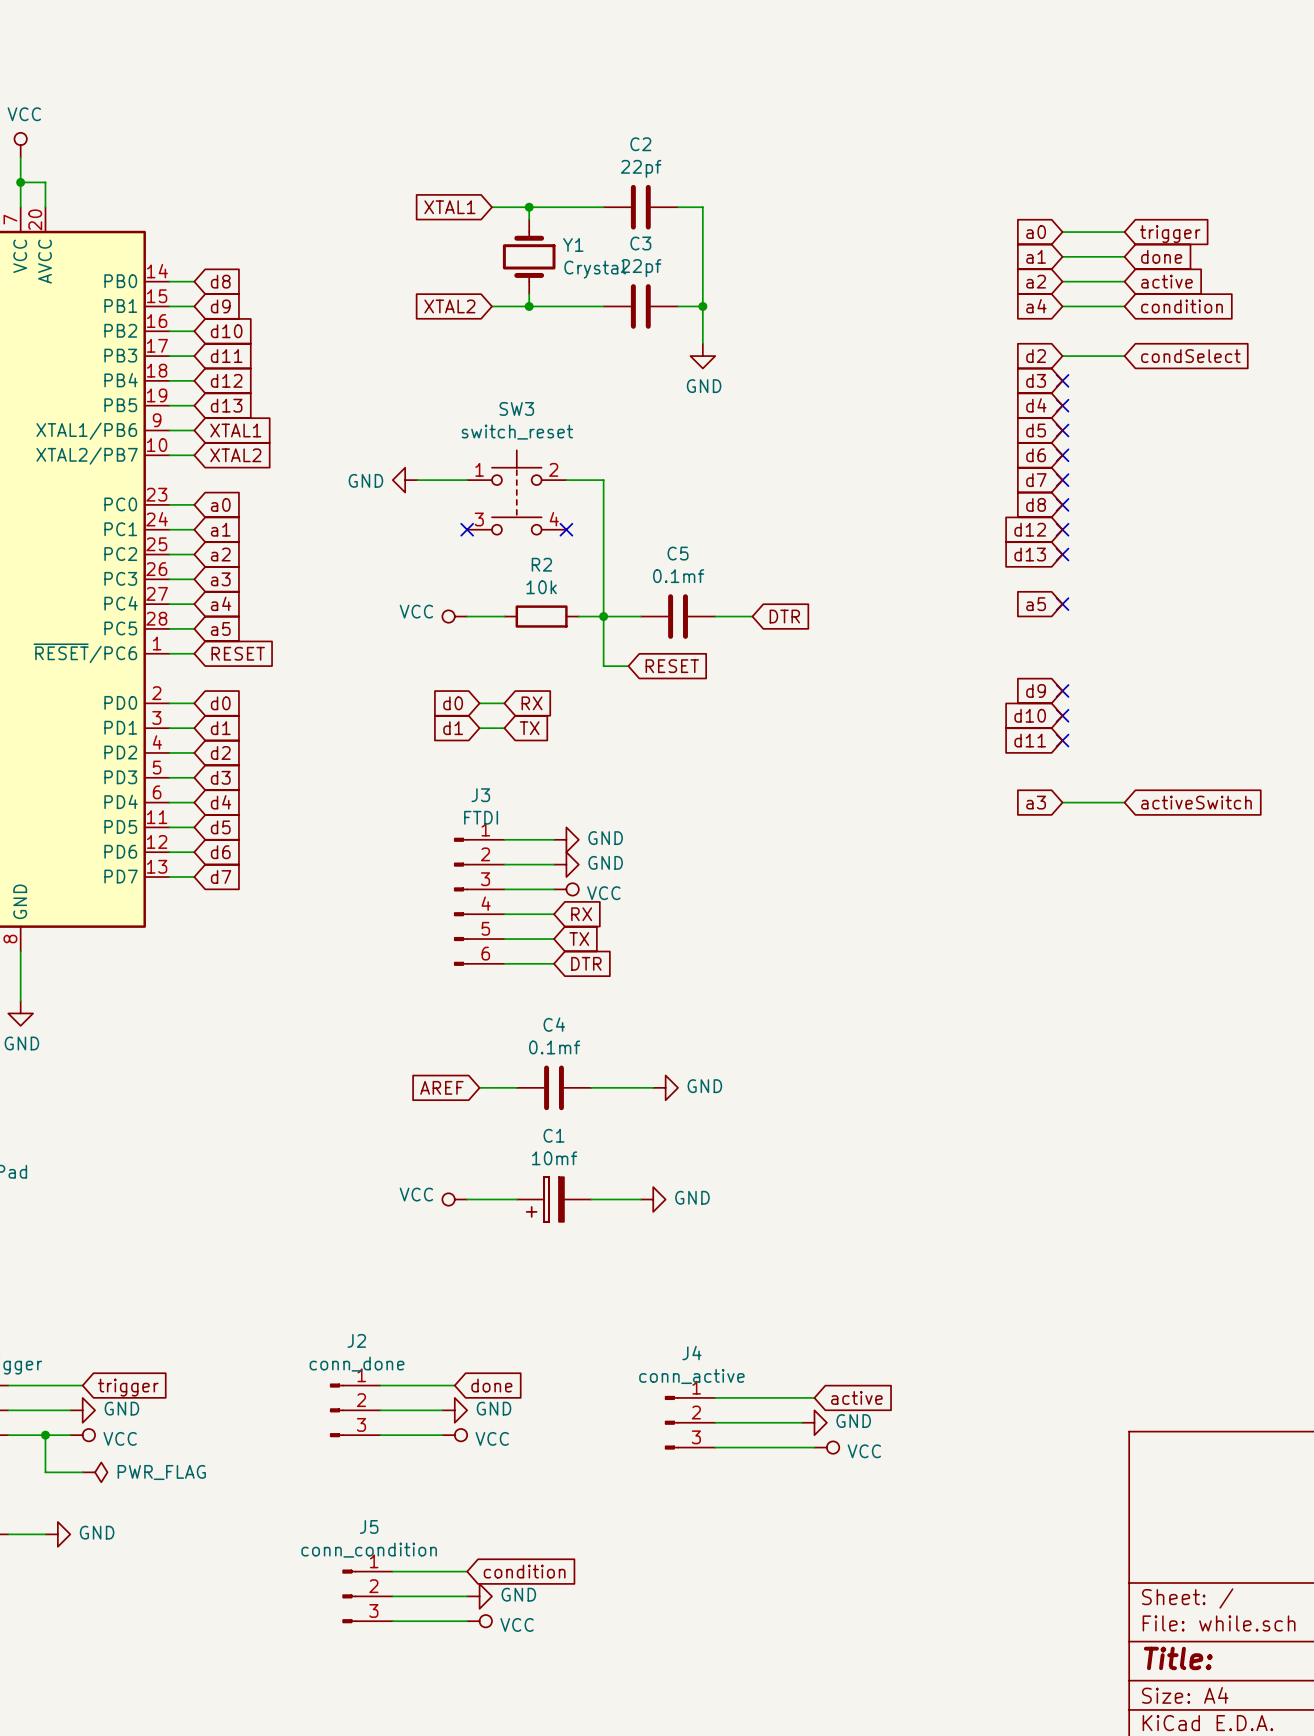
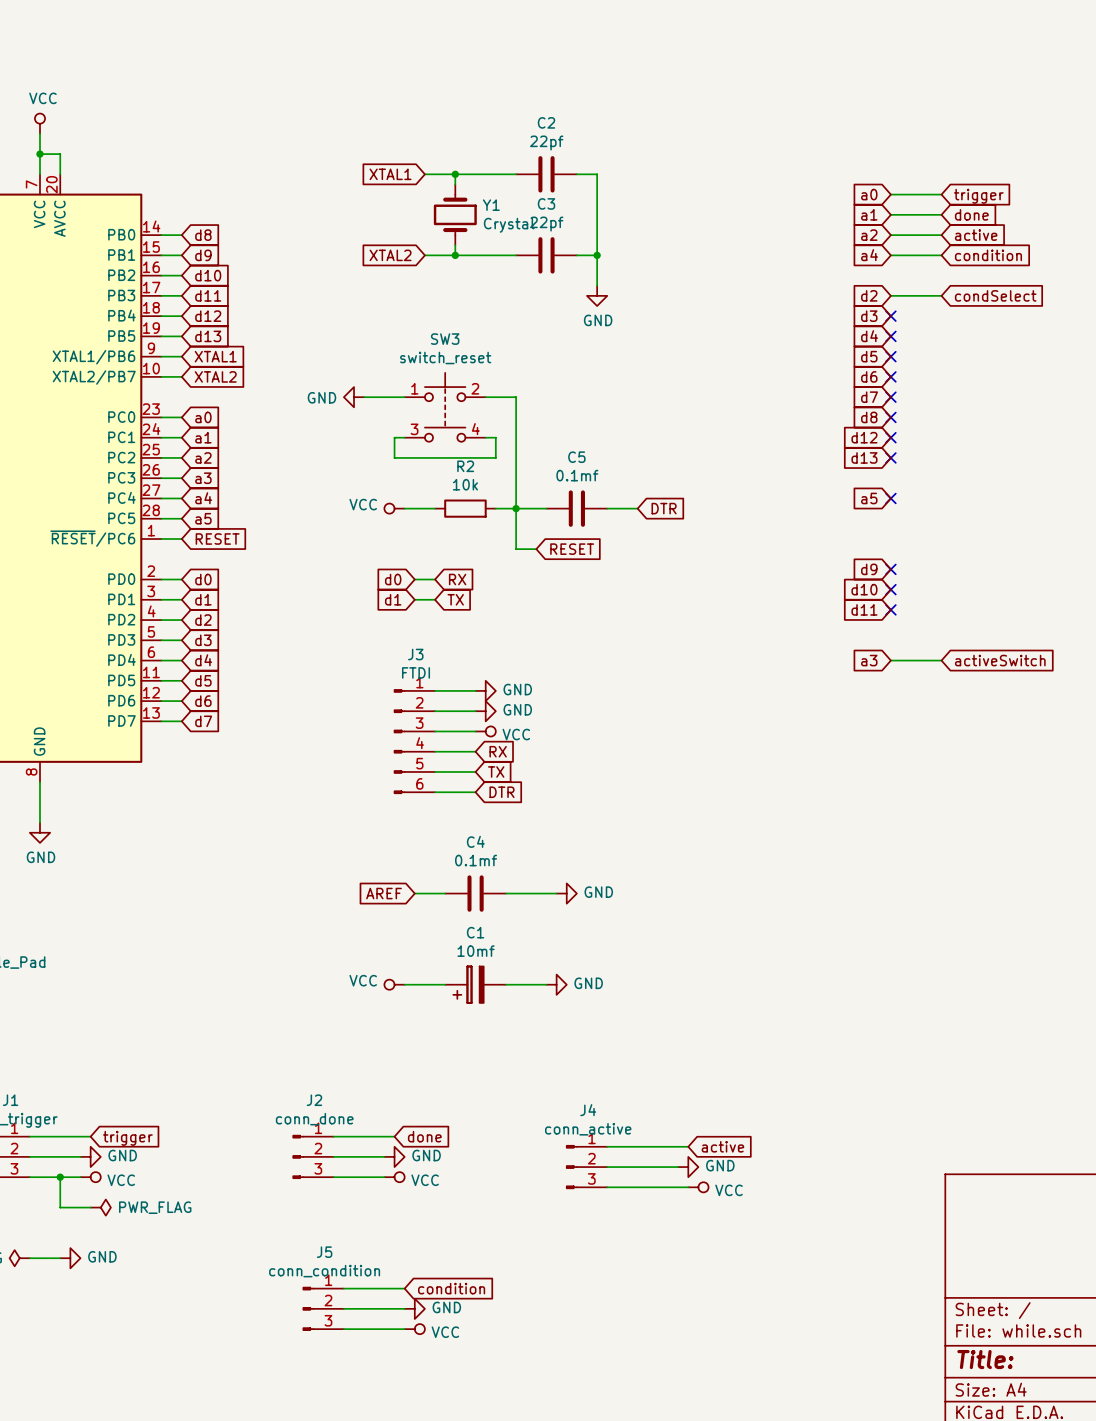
wire: none -> (404, 437) (394, 437) (394, 457) (495, 457) (495, 437) (485, 437)
no-connect mark: (467, 529) -> none
no-connect mark: (566, 529) -> none

